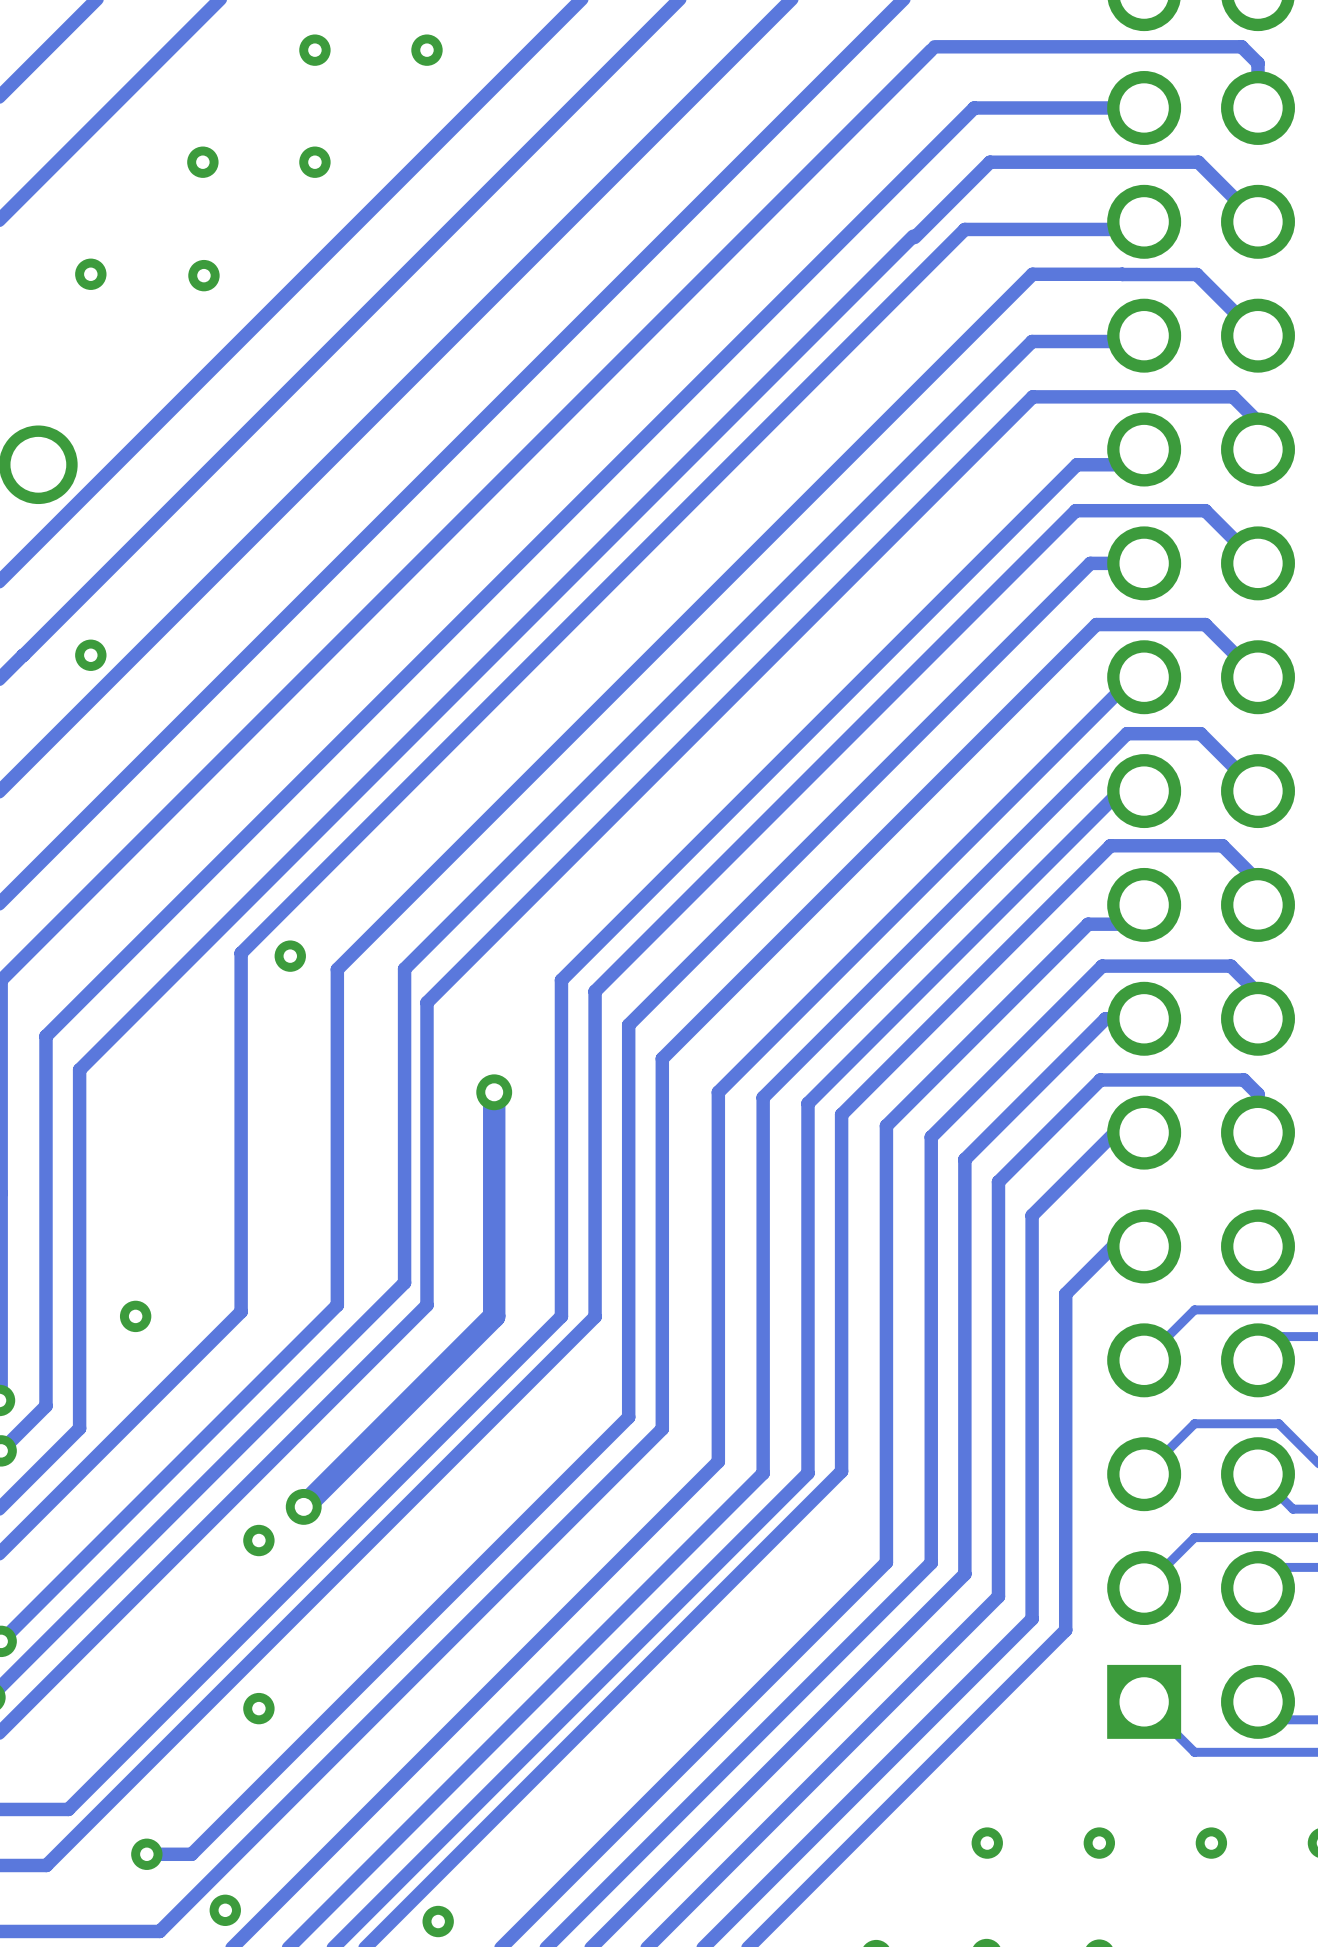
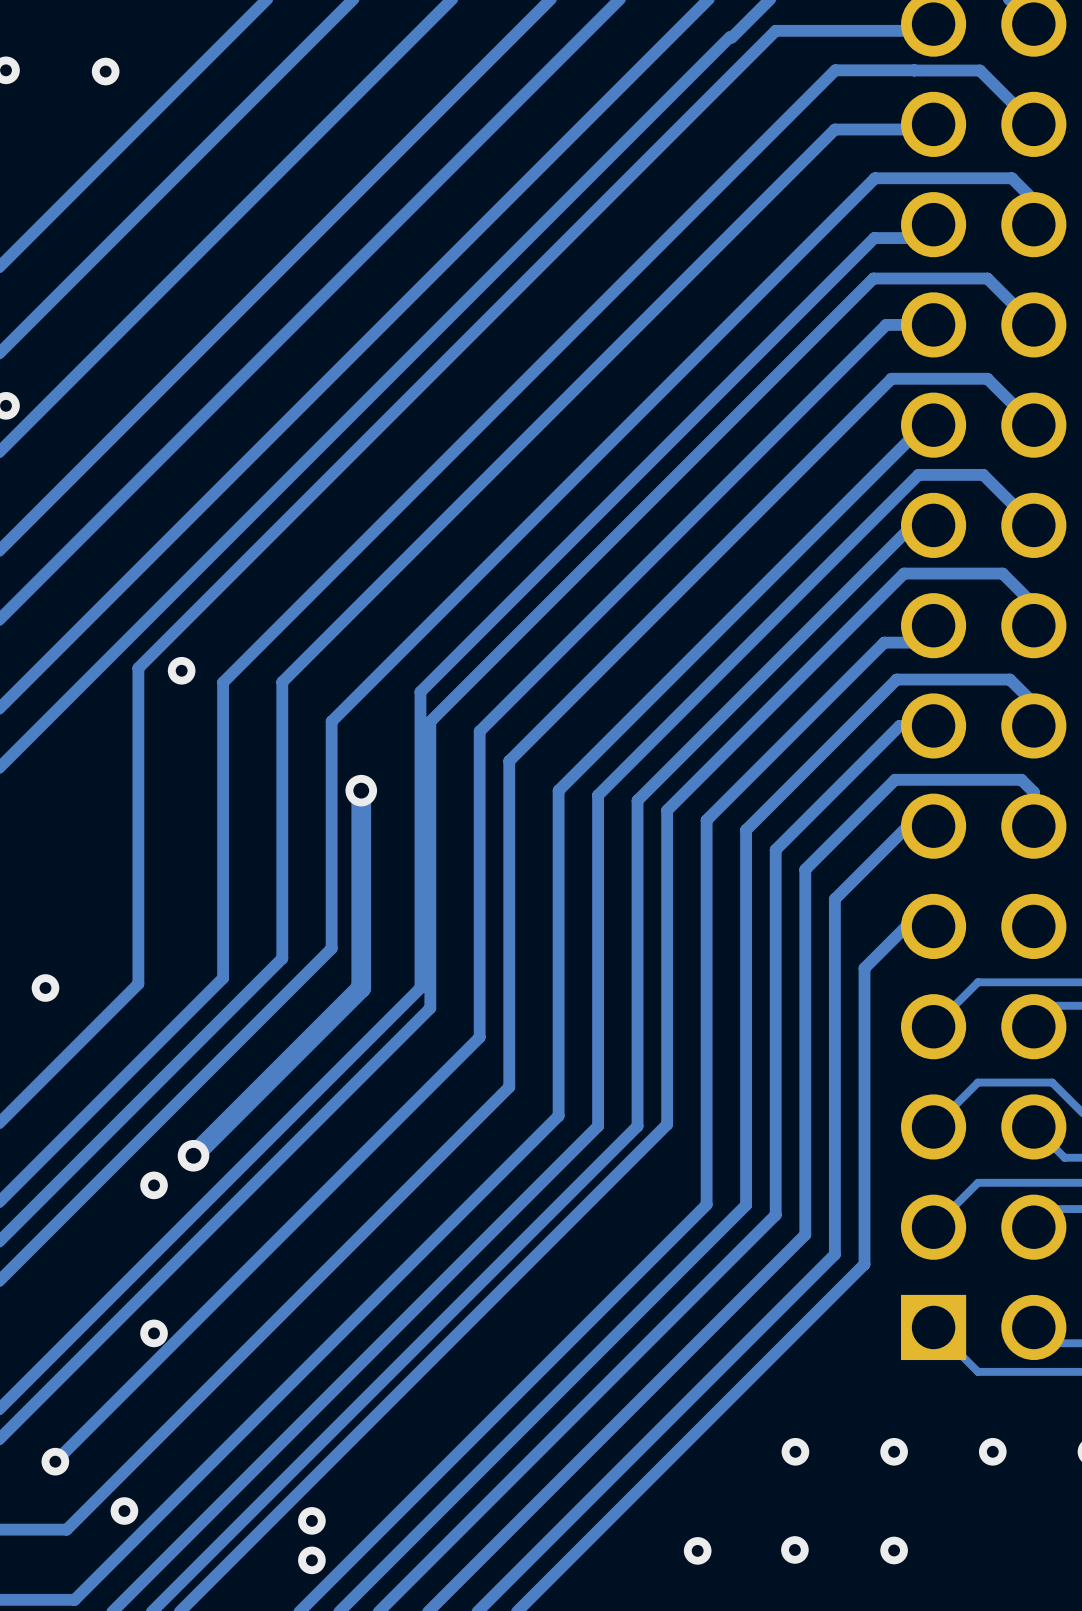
track: (1077, 396) (1032, 396) (426, 1002) (426, 1305) -> (874, 178) (331, 721) (331, 948) (302, 978)
track: (595, 991) (595, 1316) (572, 1339) -> (450, 701) (430, 721) (430, 1008)
track: (628, 1372) (628, 1417) (191, 1854) (146, 1854) -> (479, 1037) (55, 1461)

